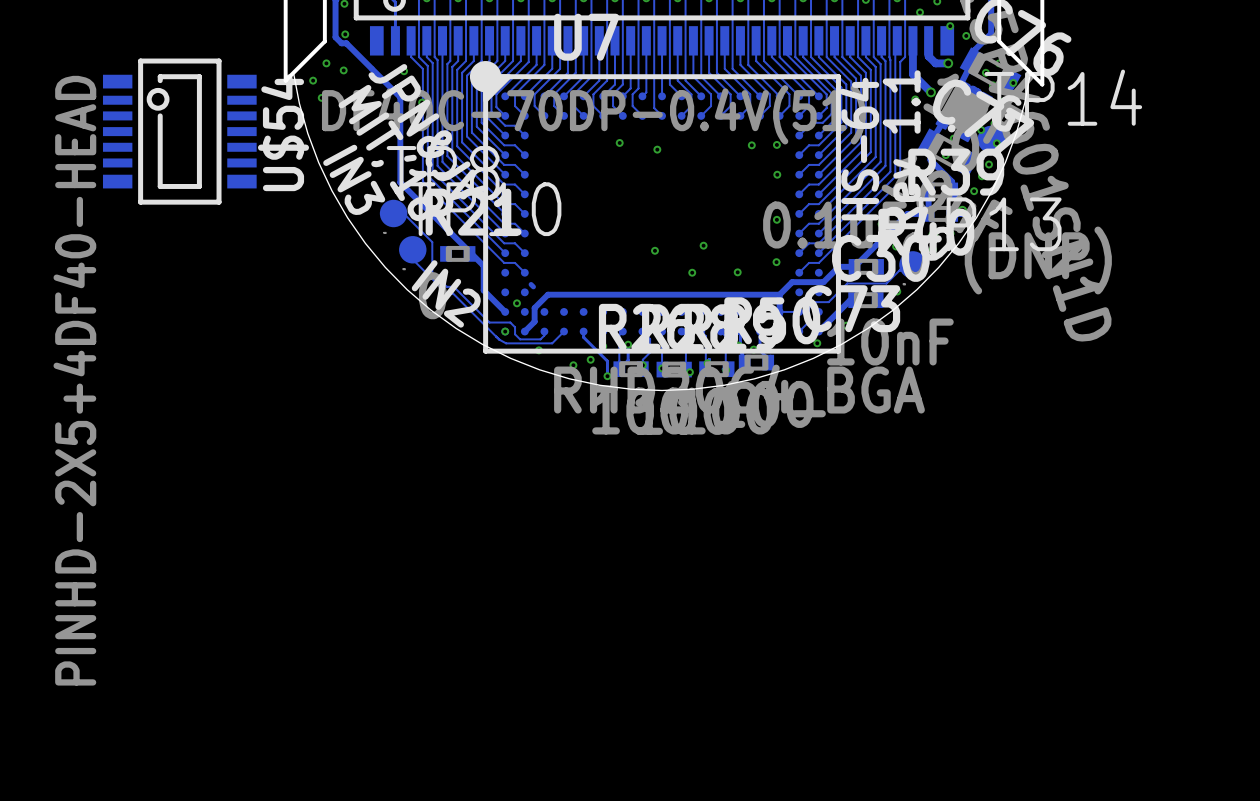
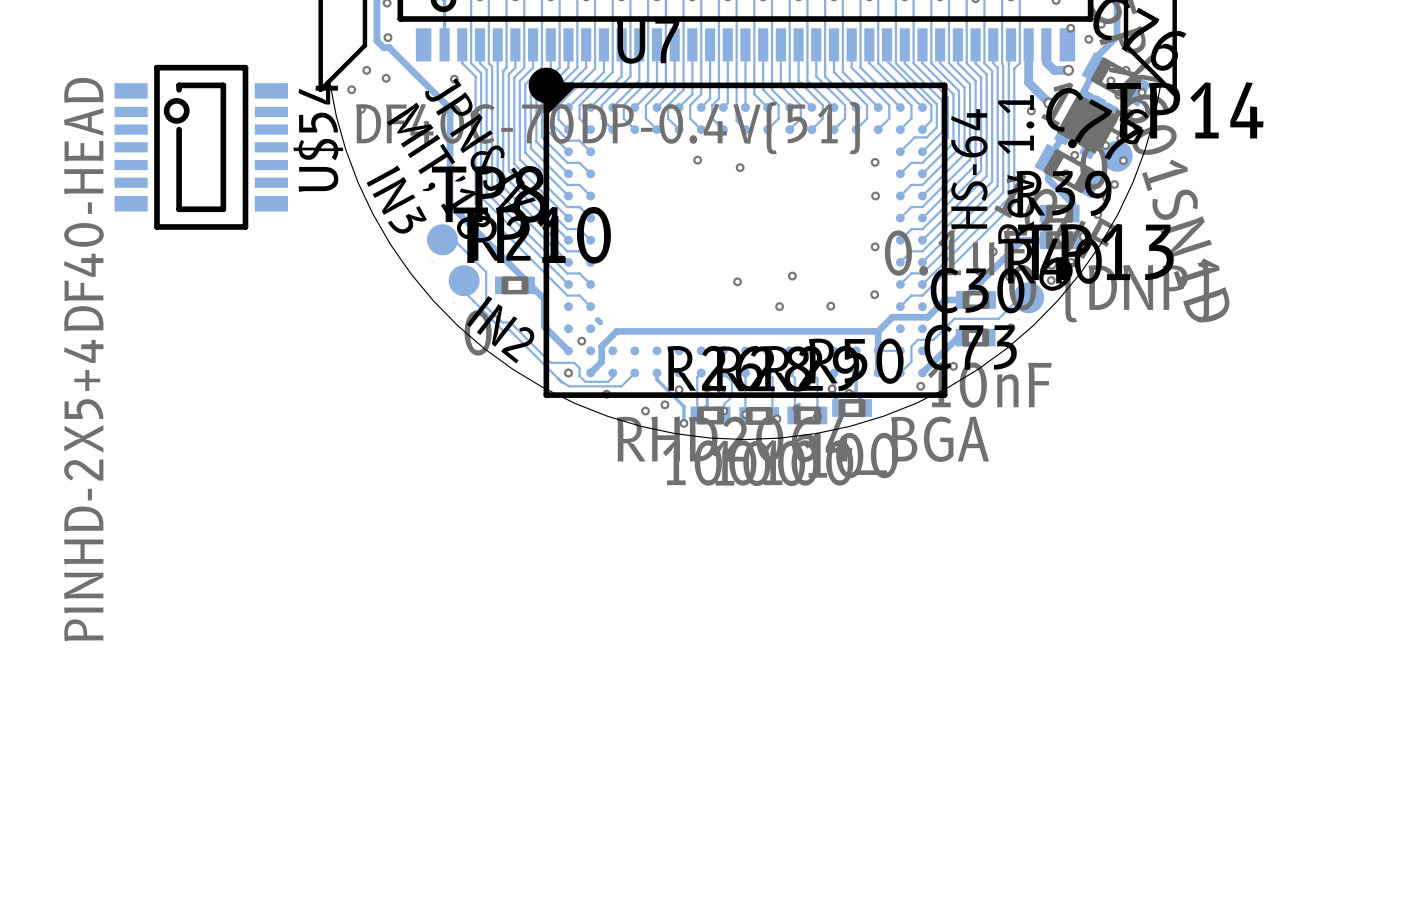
via: (920, 12) -> none
via: (751, 145) -> none

